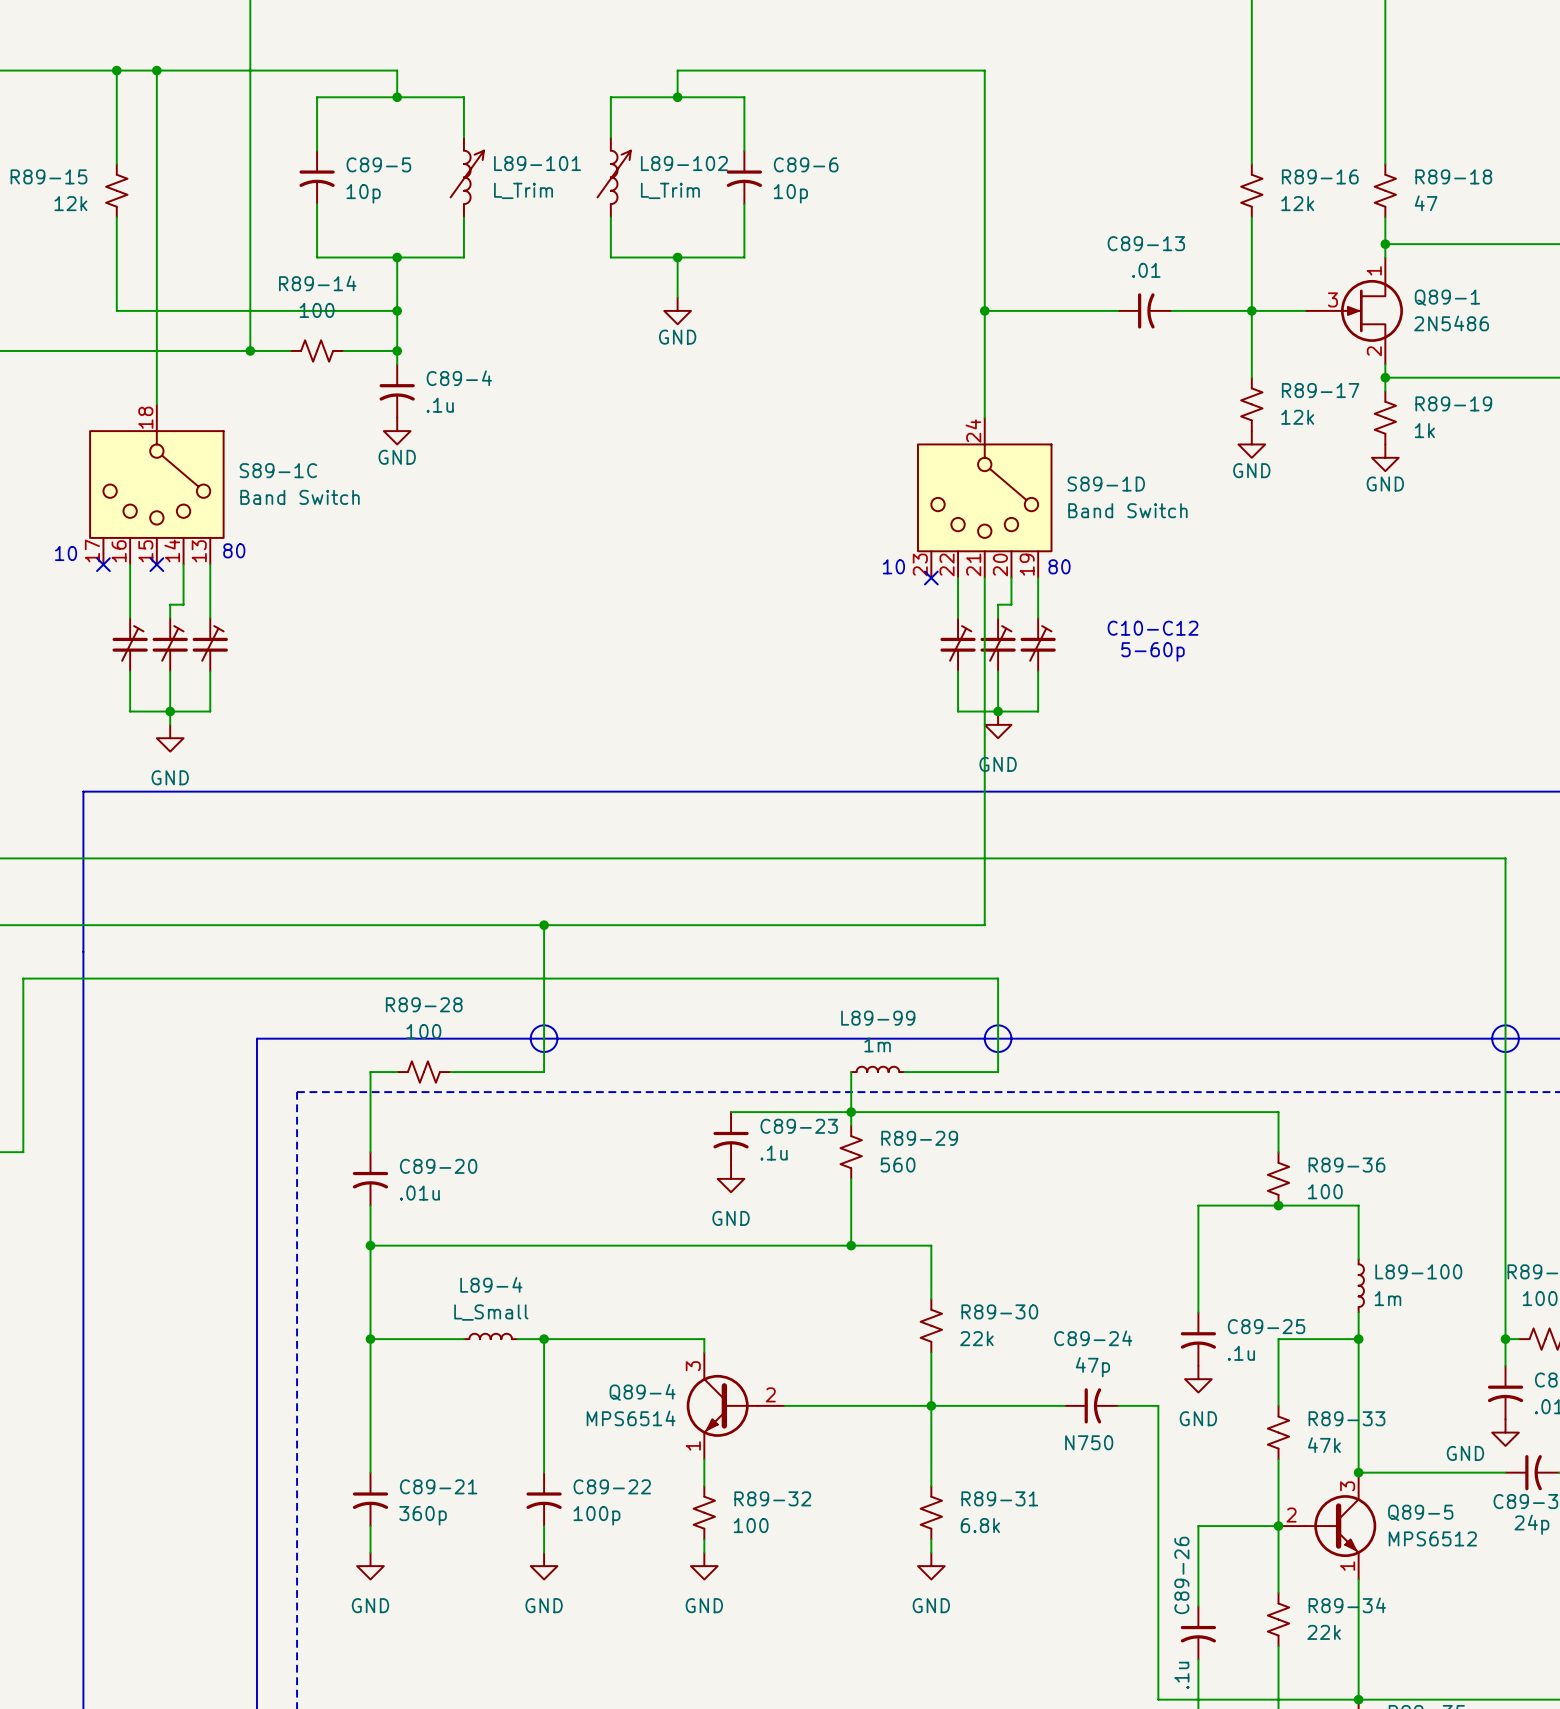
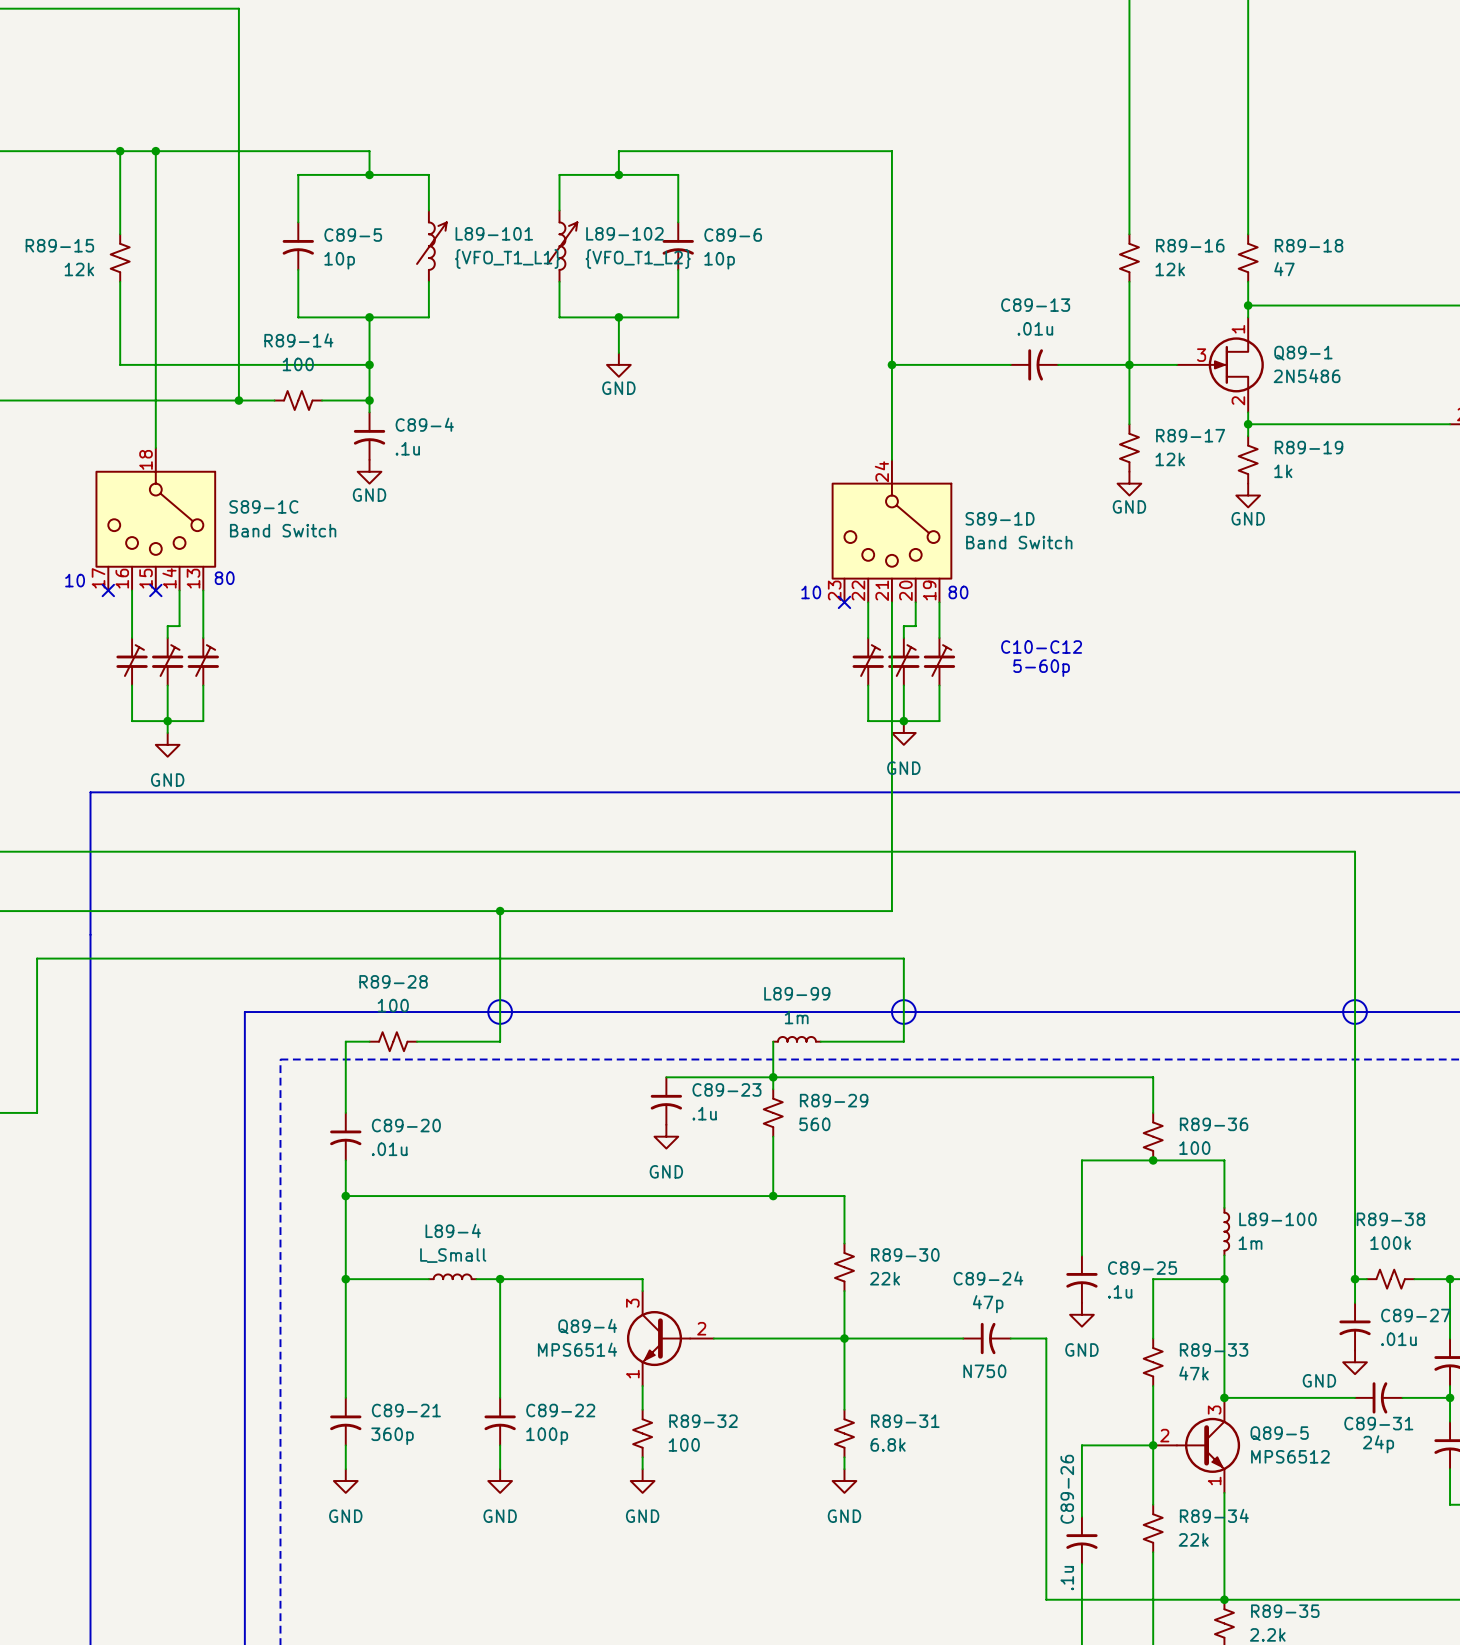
L89-101 value: L_Trim (523, 190) -> {VFO_T1_L1} (507, 259)
L89-102 value: L_Trim (670, 190) -> {VFO_T1_L2} (638, 259)
C89-13 value: .01 (1146, 270) -> .01u (1035, 328)

